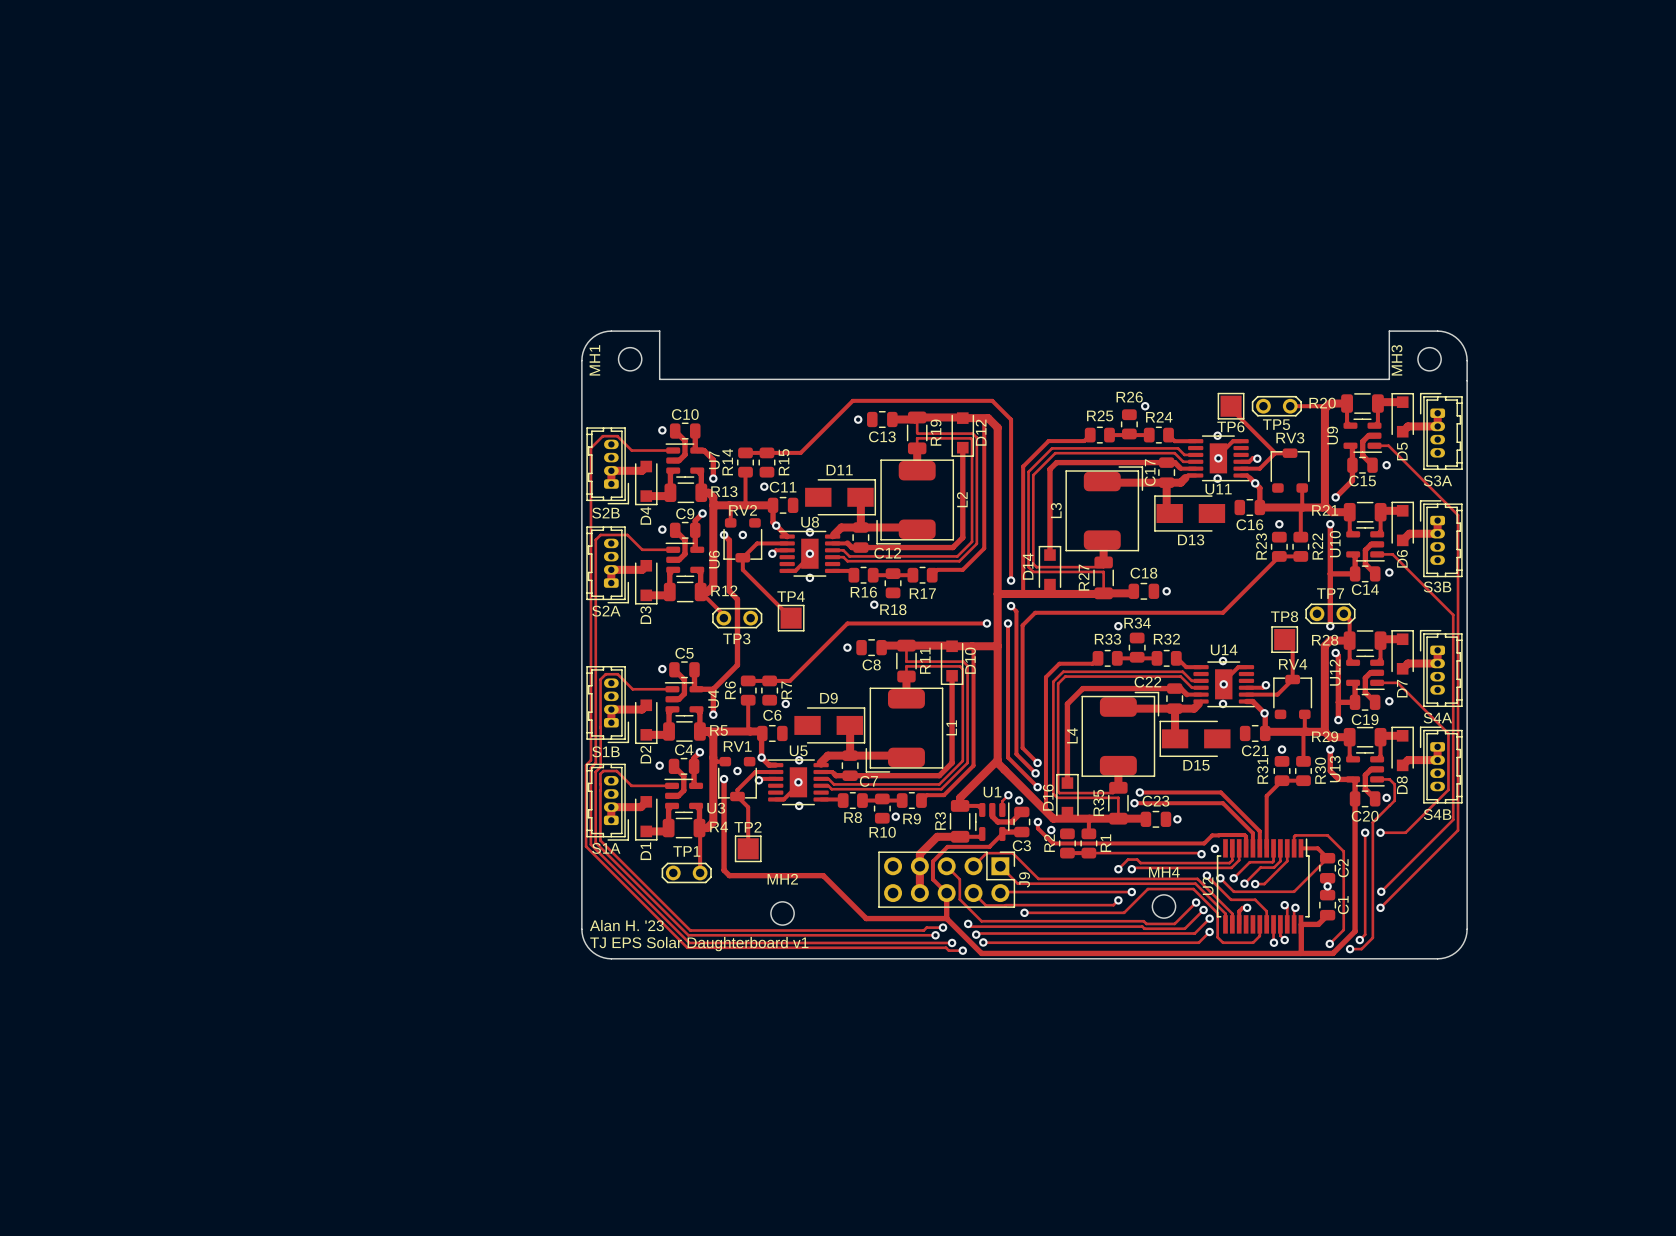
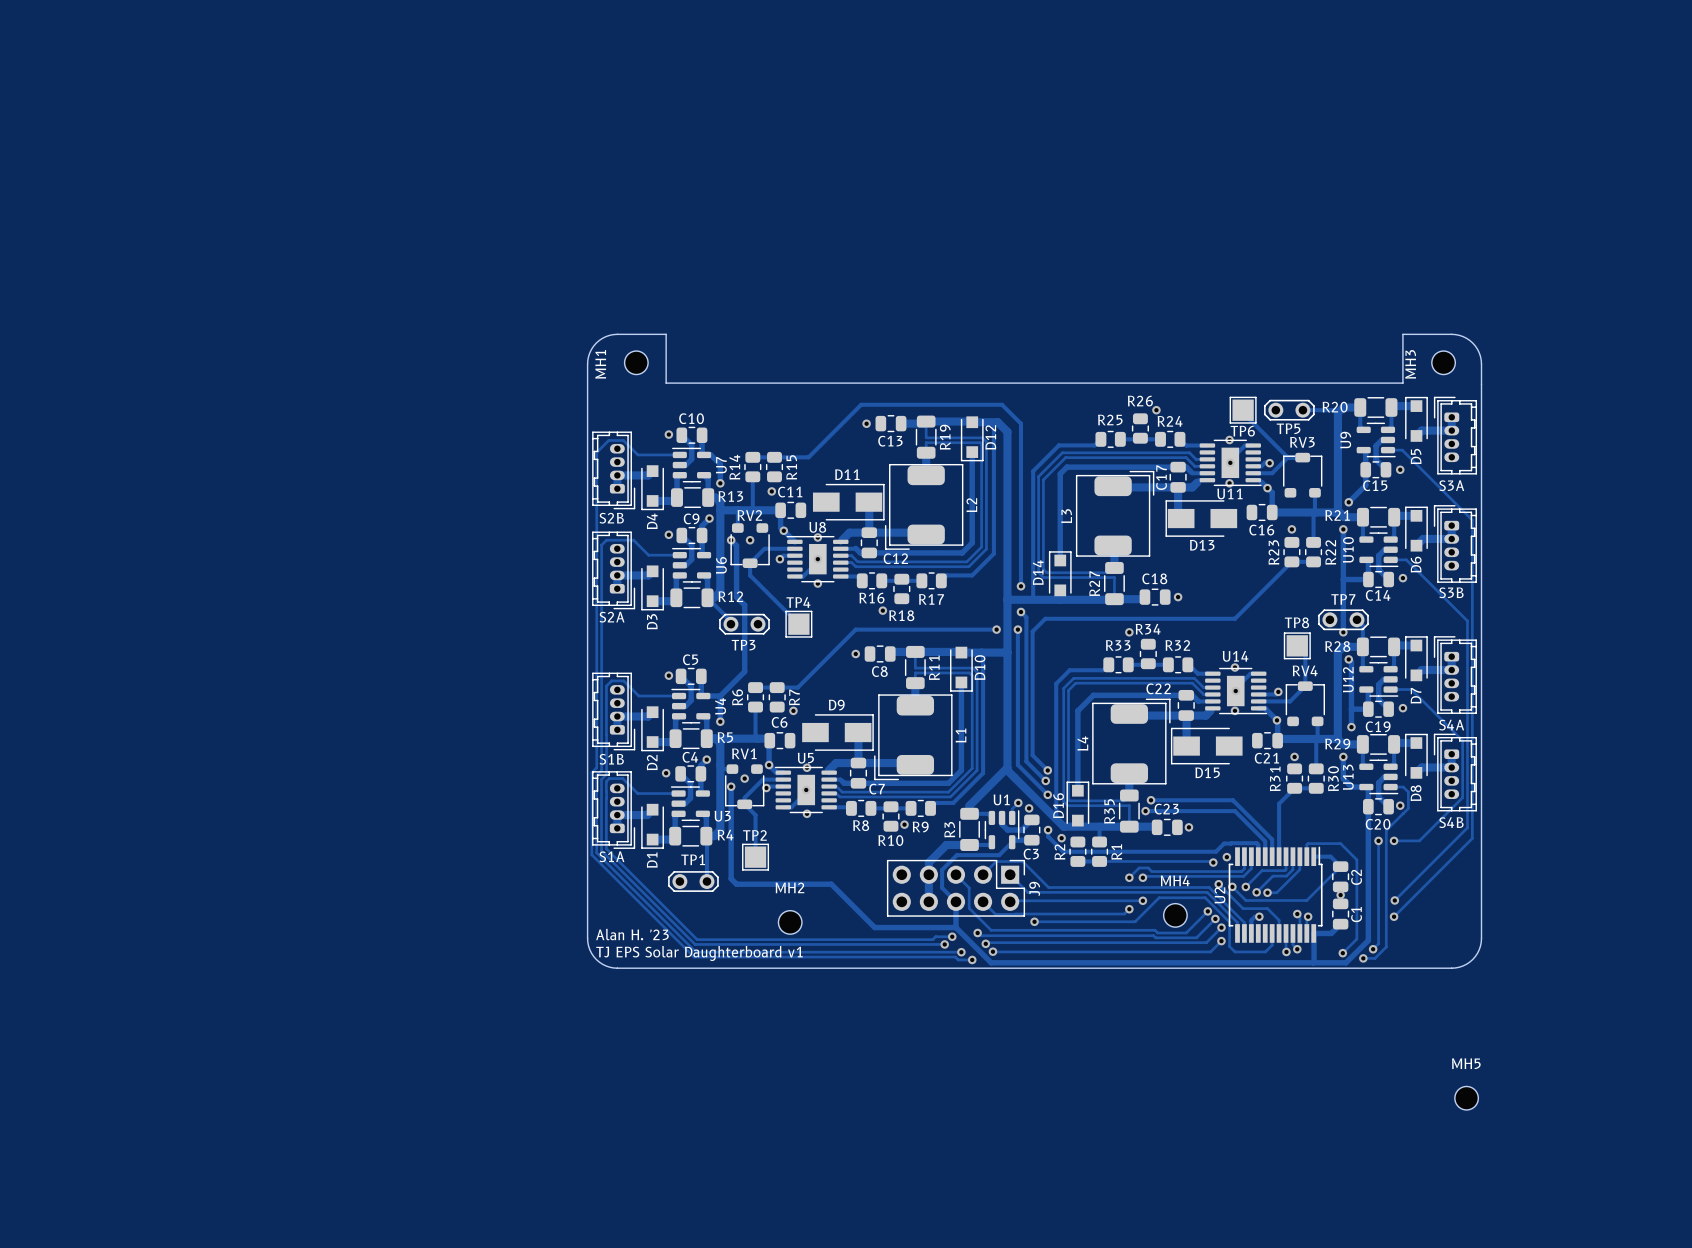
MH5: none -> (1466, 1098)

